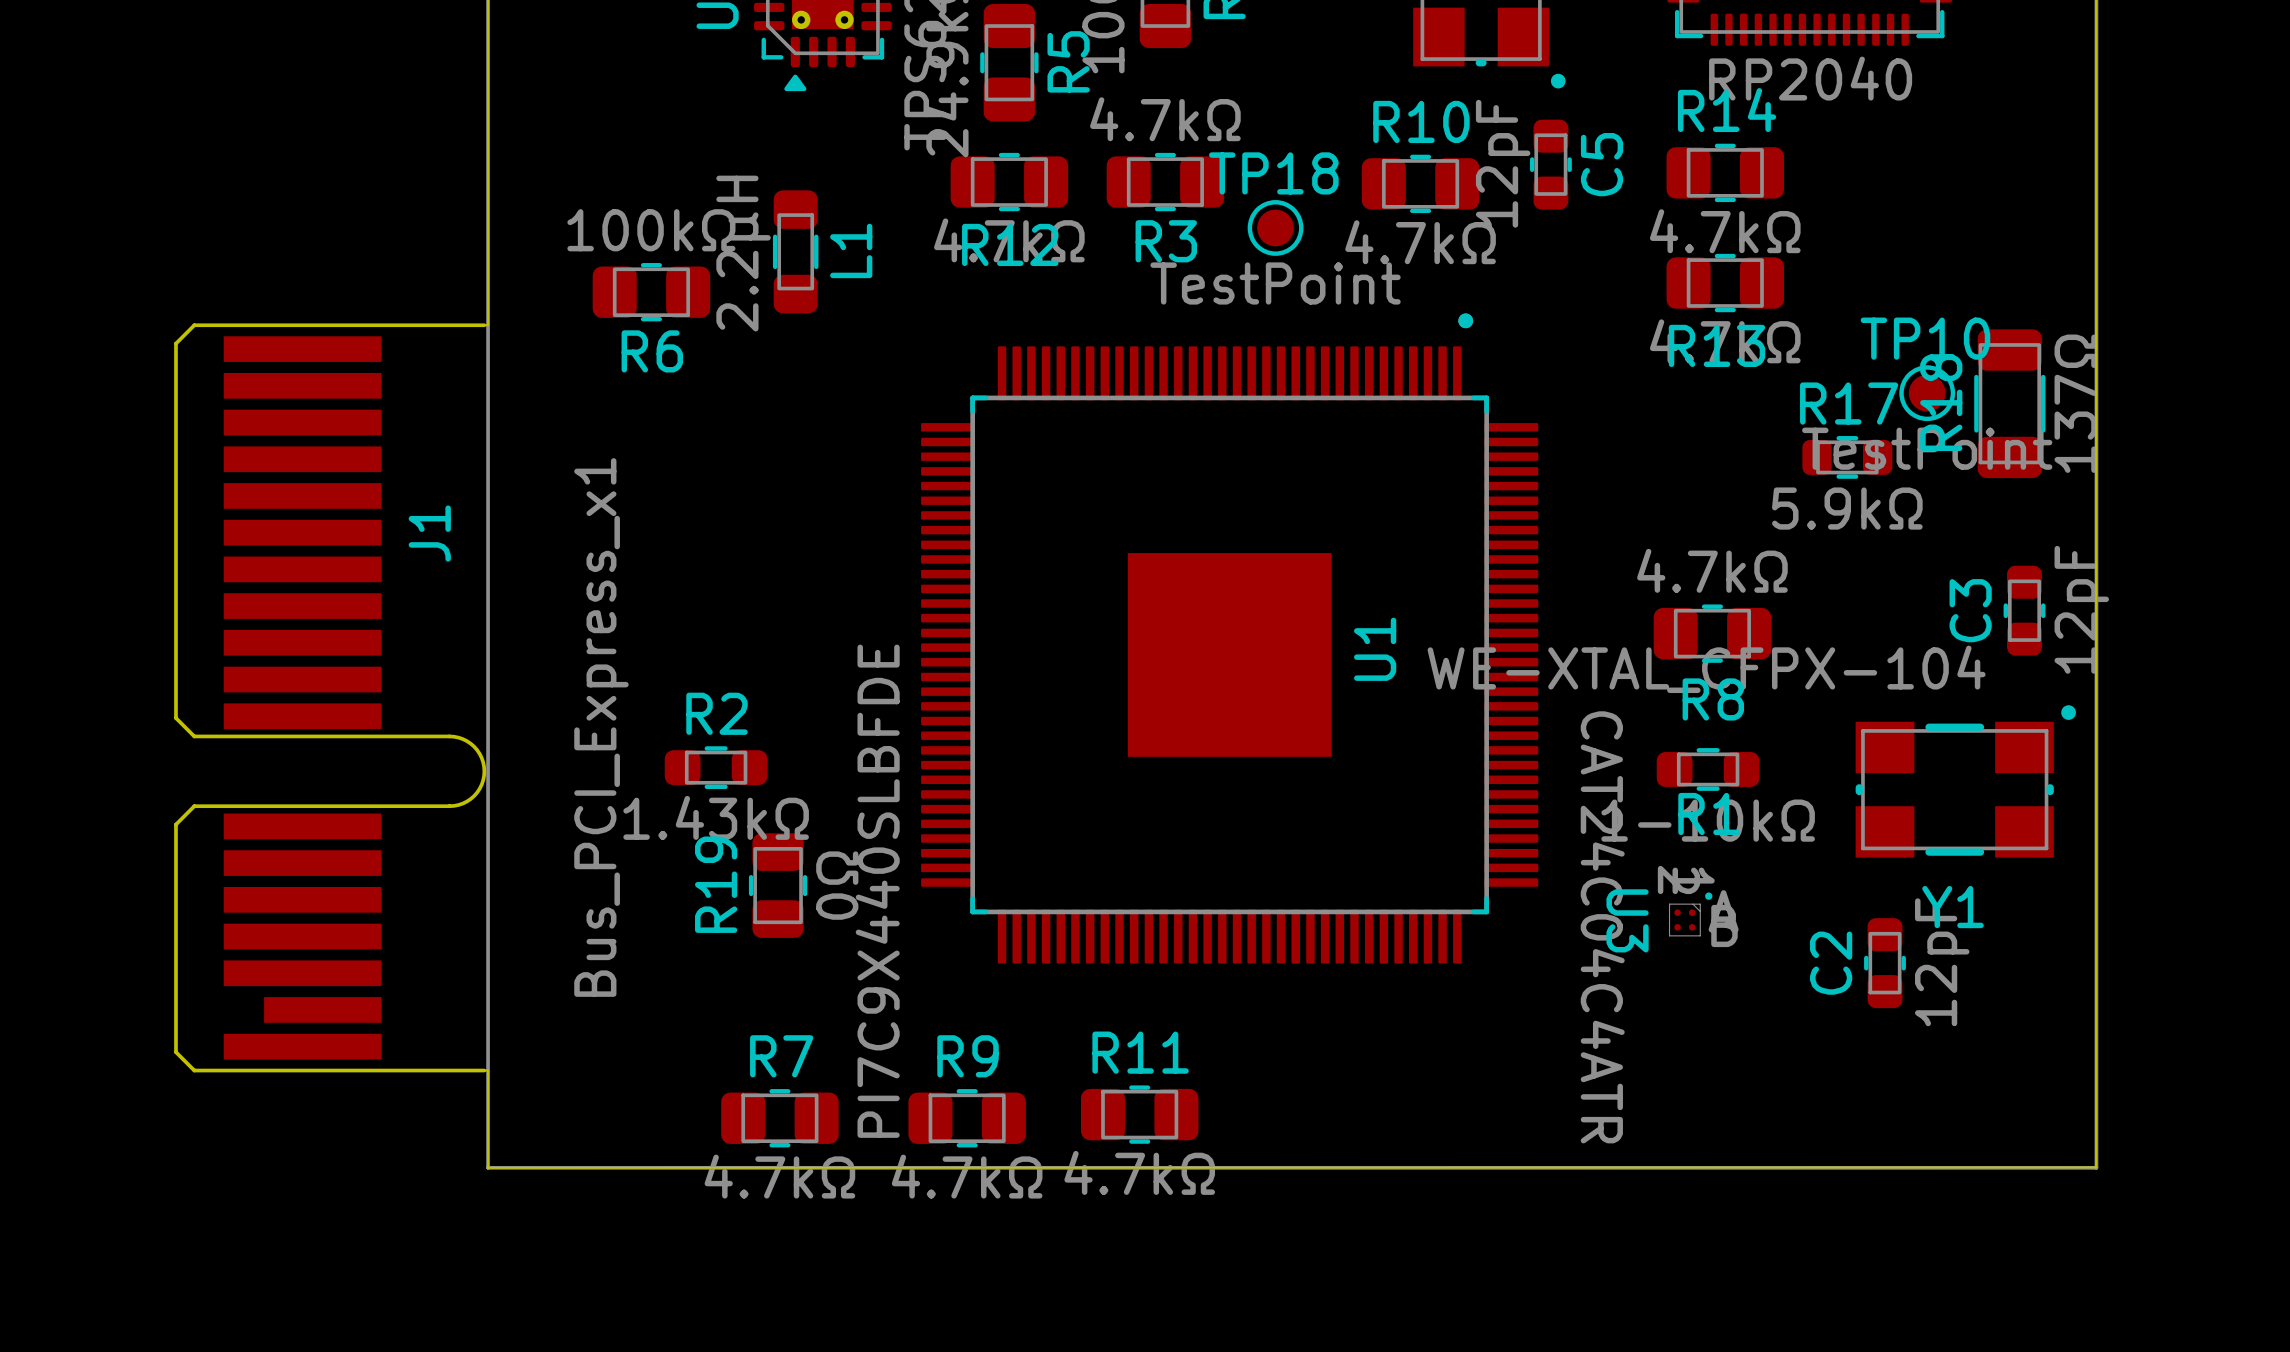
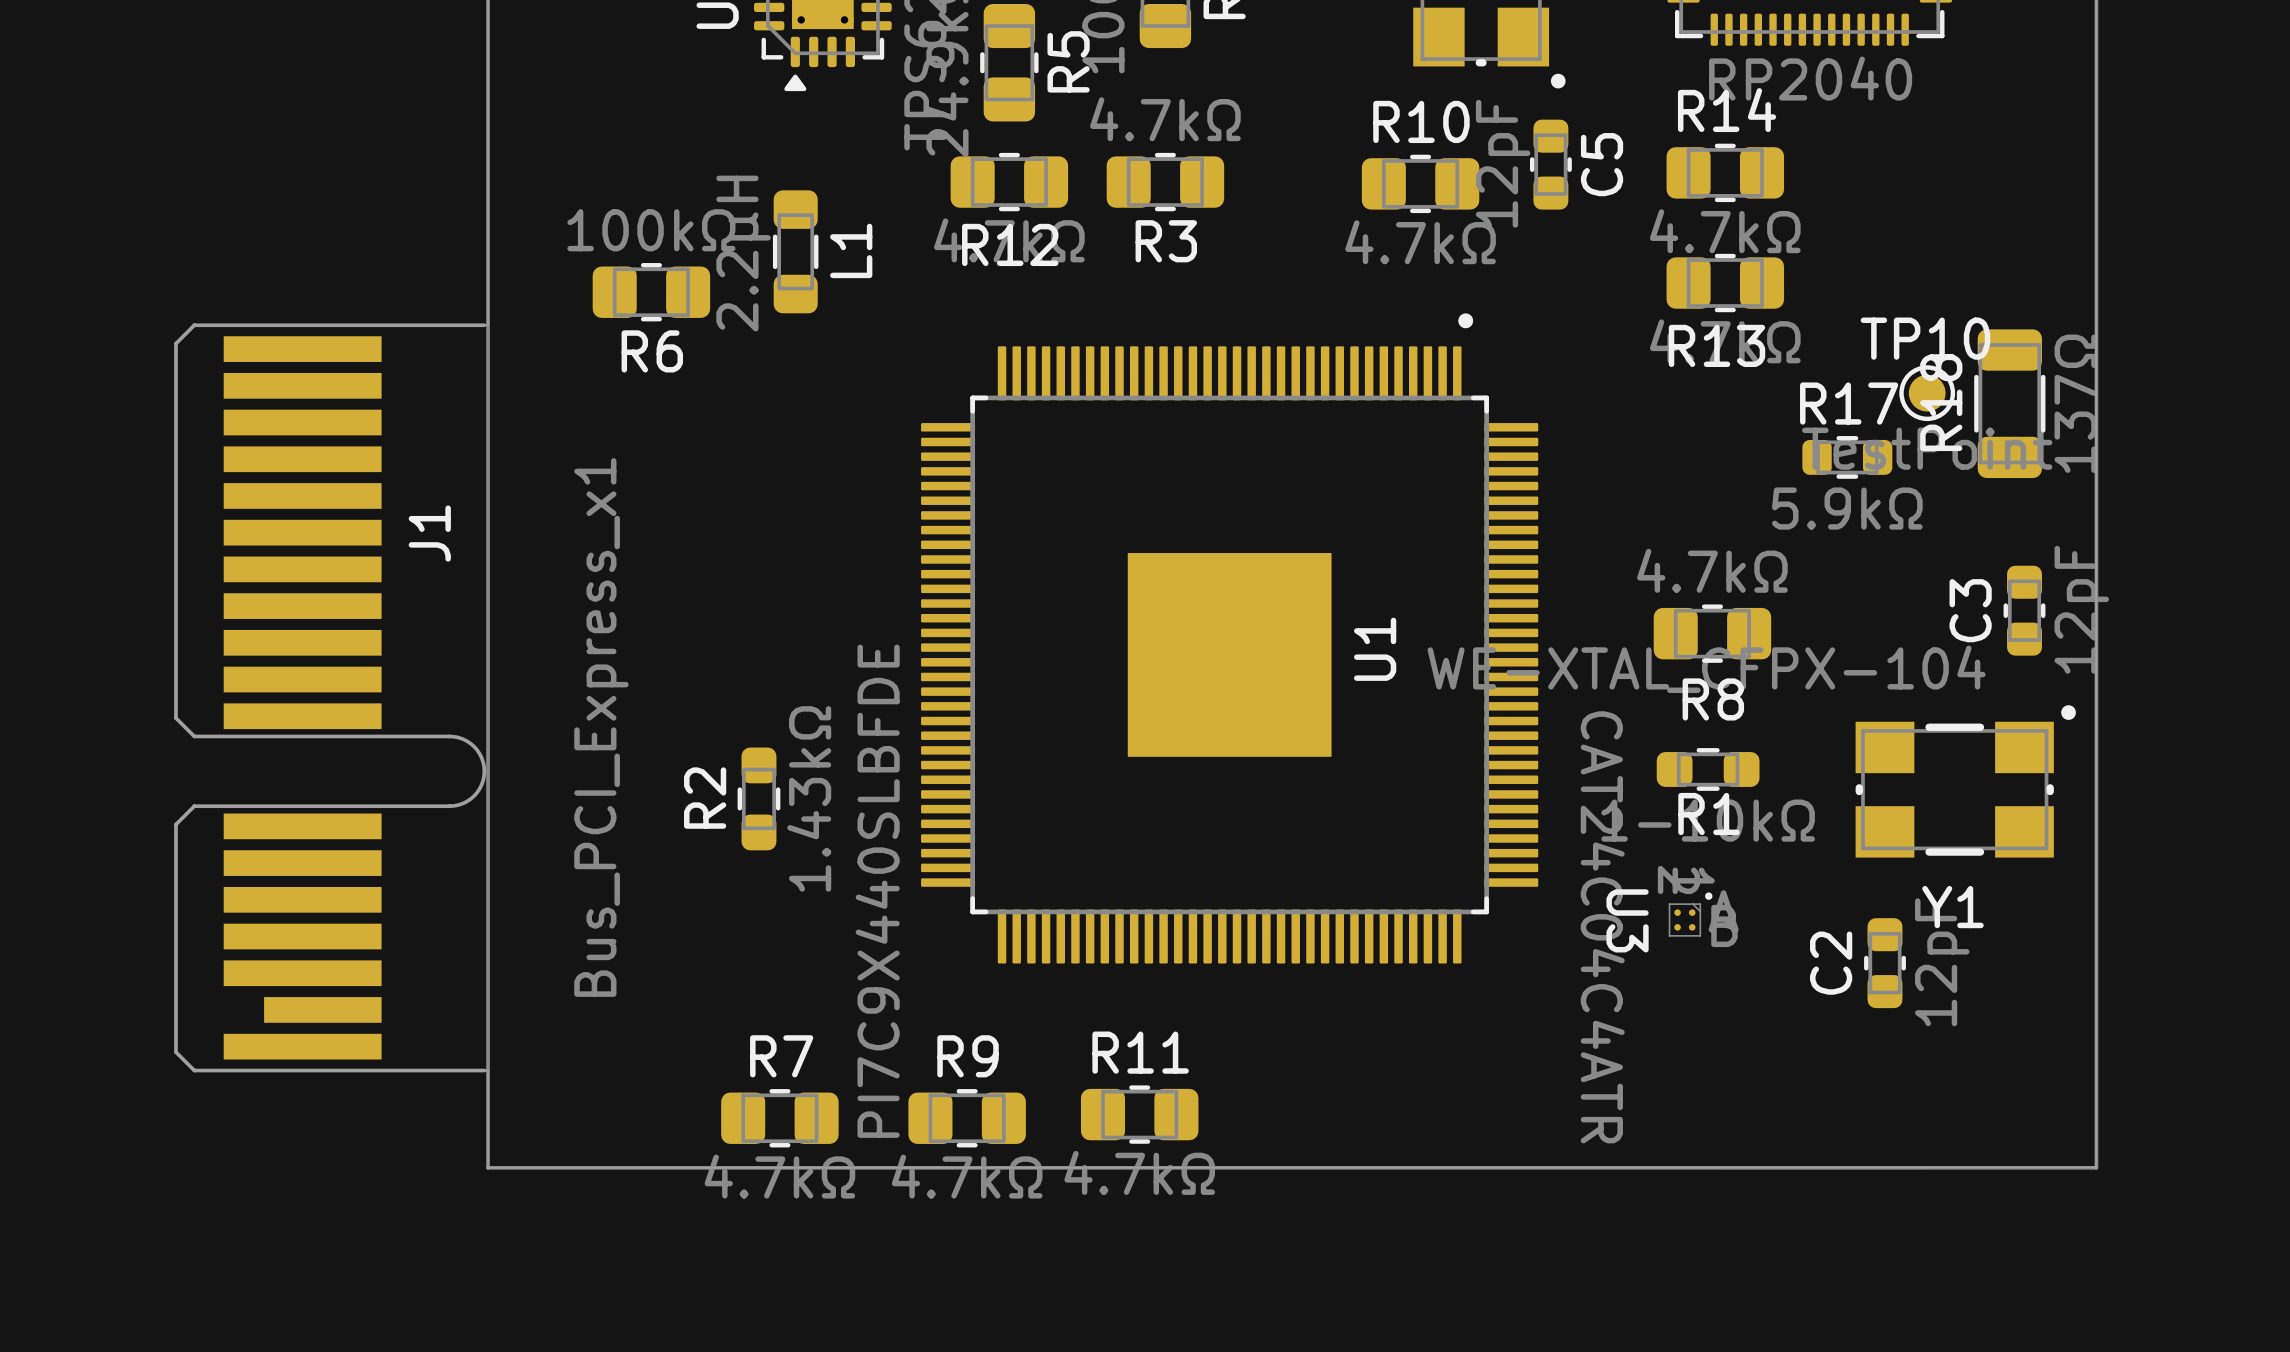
TP18: TestPoint (1275, 227) -> none
R2 name position: R2 (717, 713) -> R2 (705, 798)
R2 rotation: 0° (716, 767) -> 90° clockwise (758, 798)
R2 value position: 1.43kΩ (716, 817) -> 1.43kΩ (809, 798)
R19: 0Ω (778, 885) -> none

